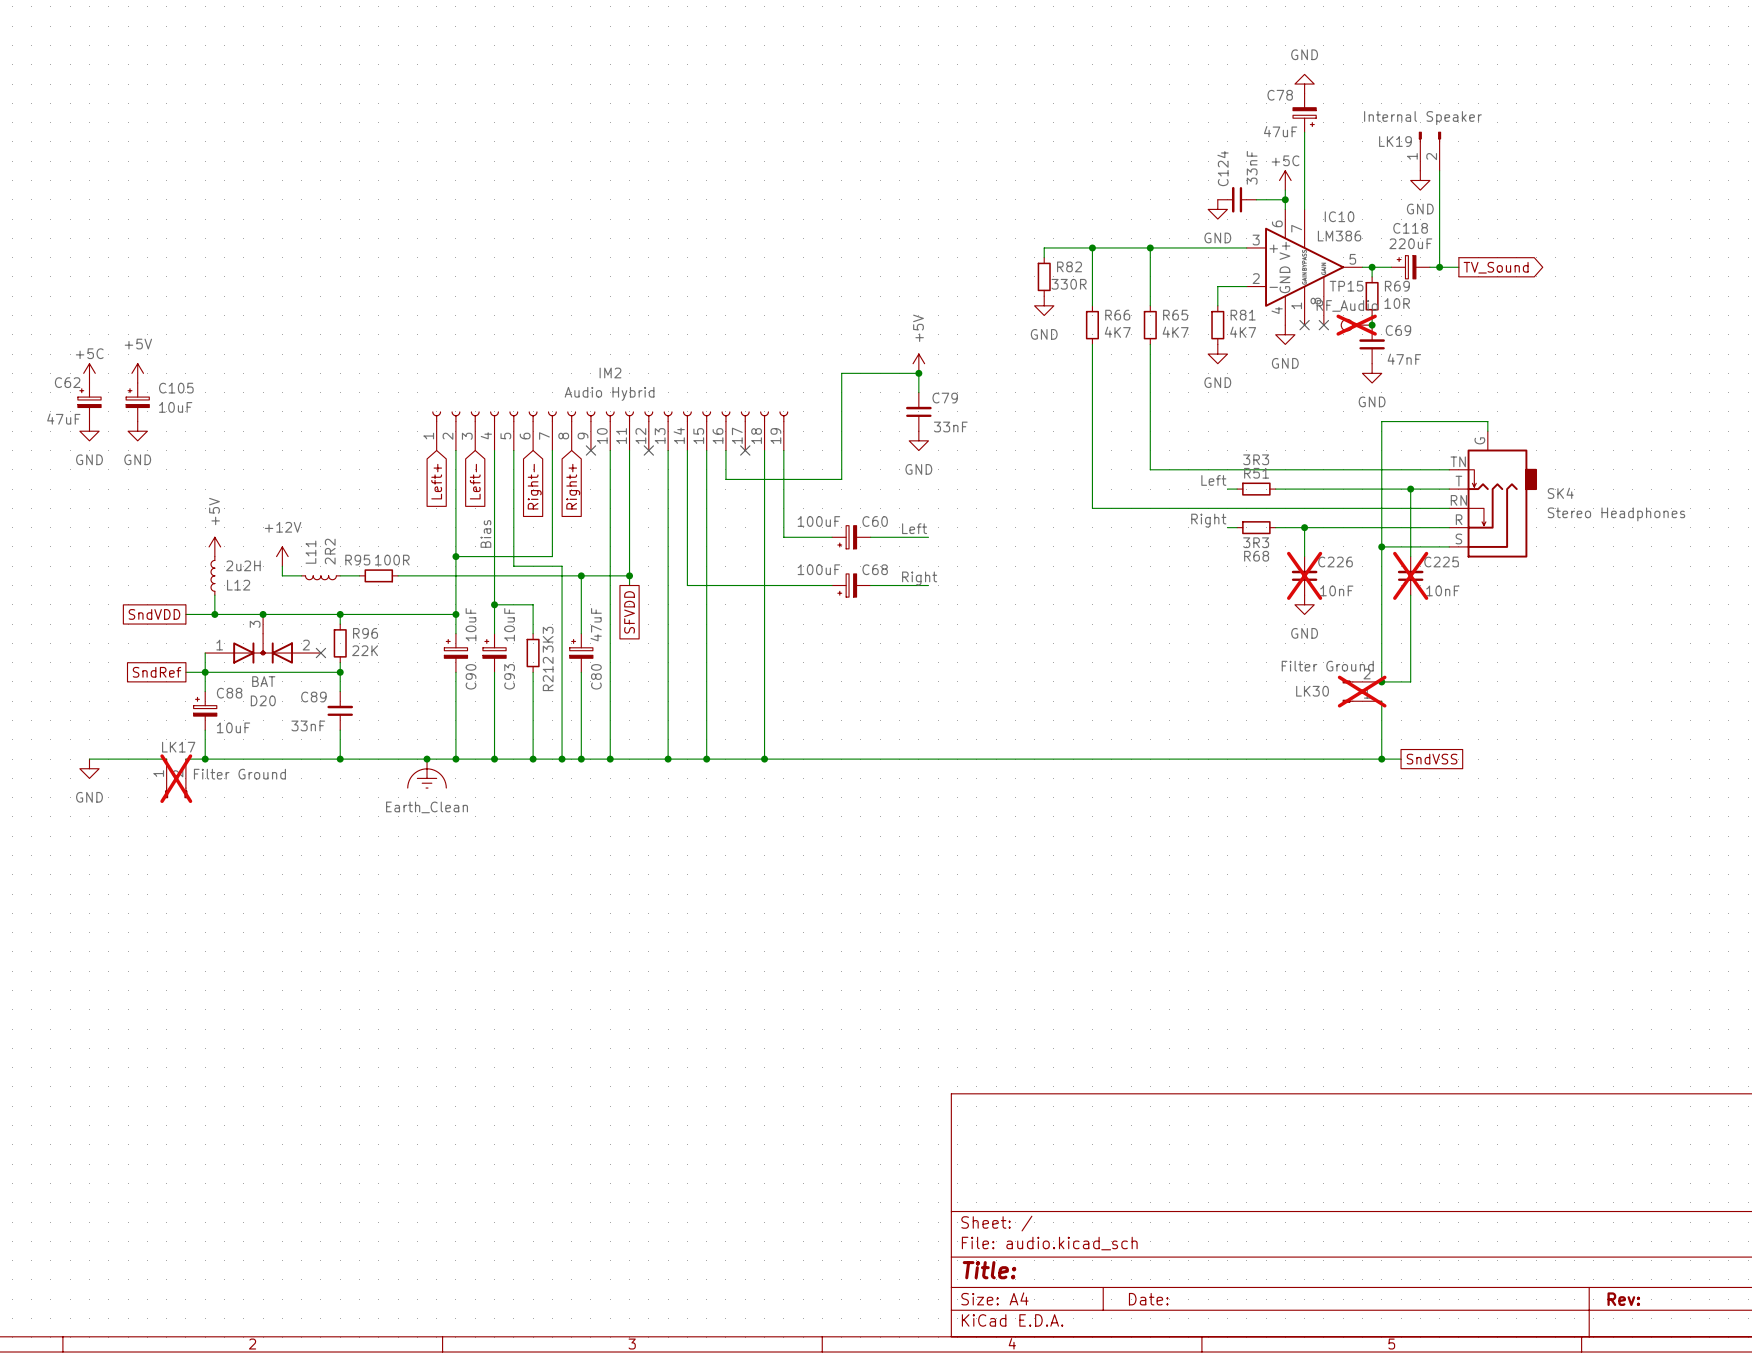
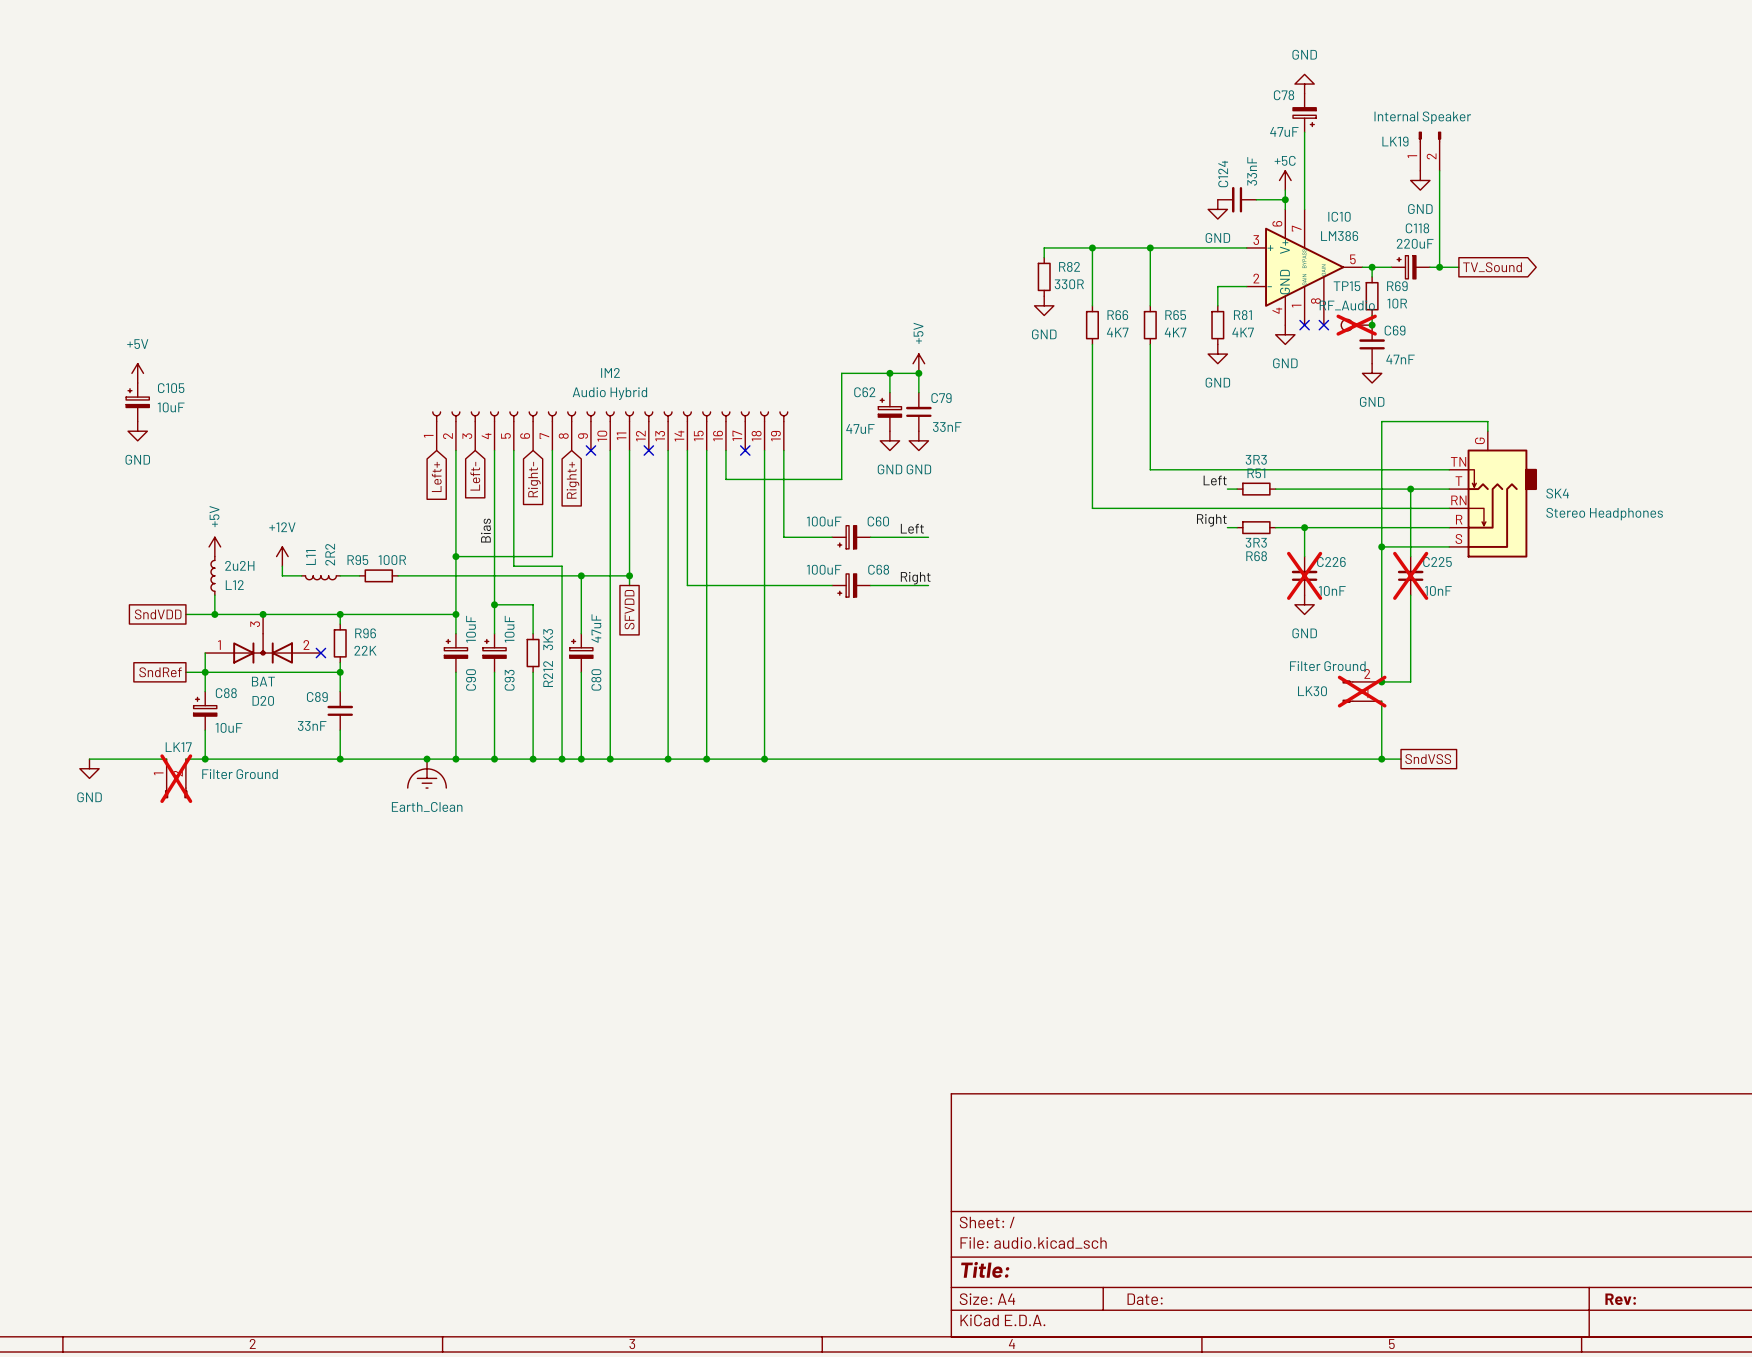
power symbol: +5C (89, 373) -> none
wire: none -> (889, 373) (889, 392)
junction: none -> (889, 373)
C62 position: (89, 402) -> (889, 411)
power symbol: GND (89, 431) -> none
power symbol: none -> GND (889, 440)

